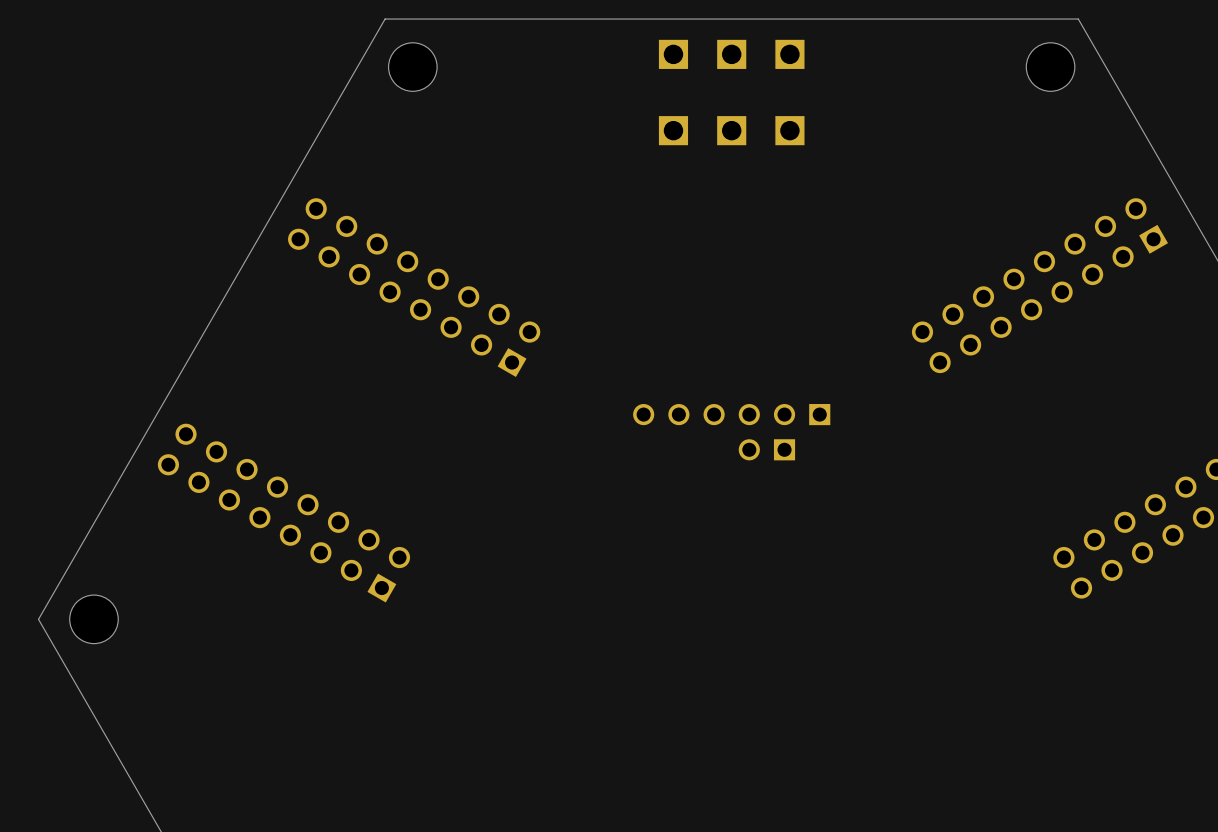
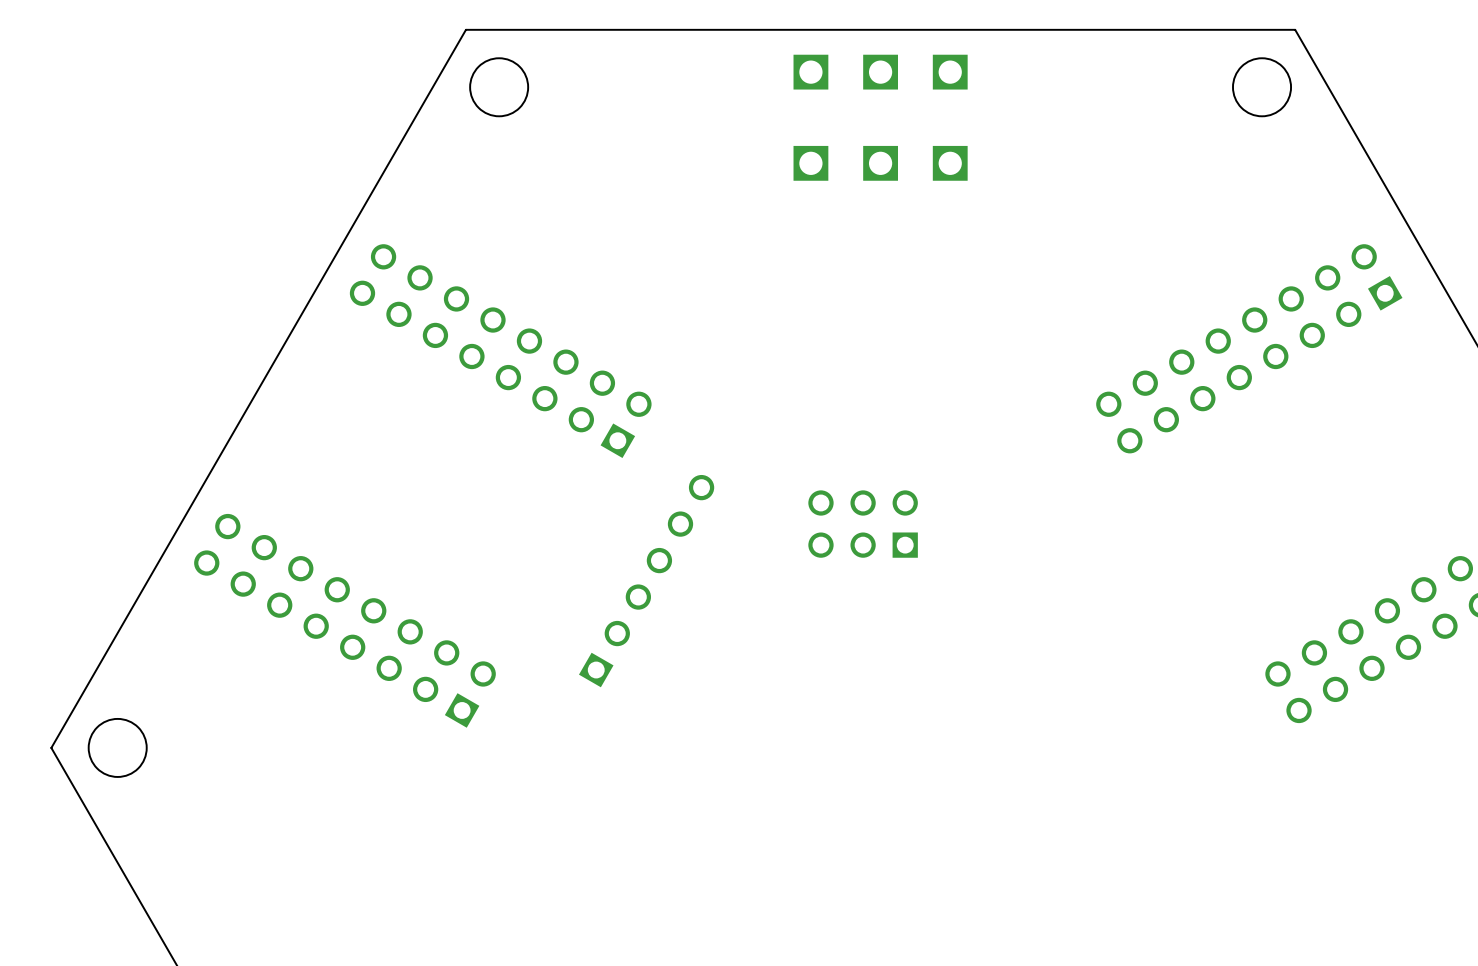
part: (731, 414) -> none
part: none -> (863, 524)
part: (766, 449) -> none
part: none -> (646, 581)

